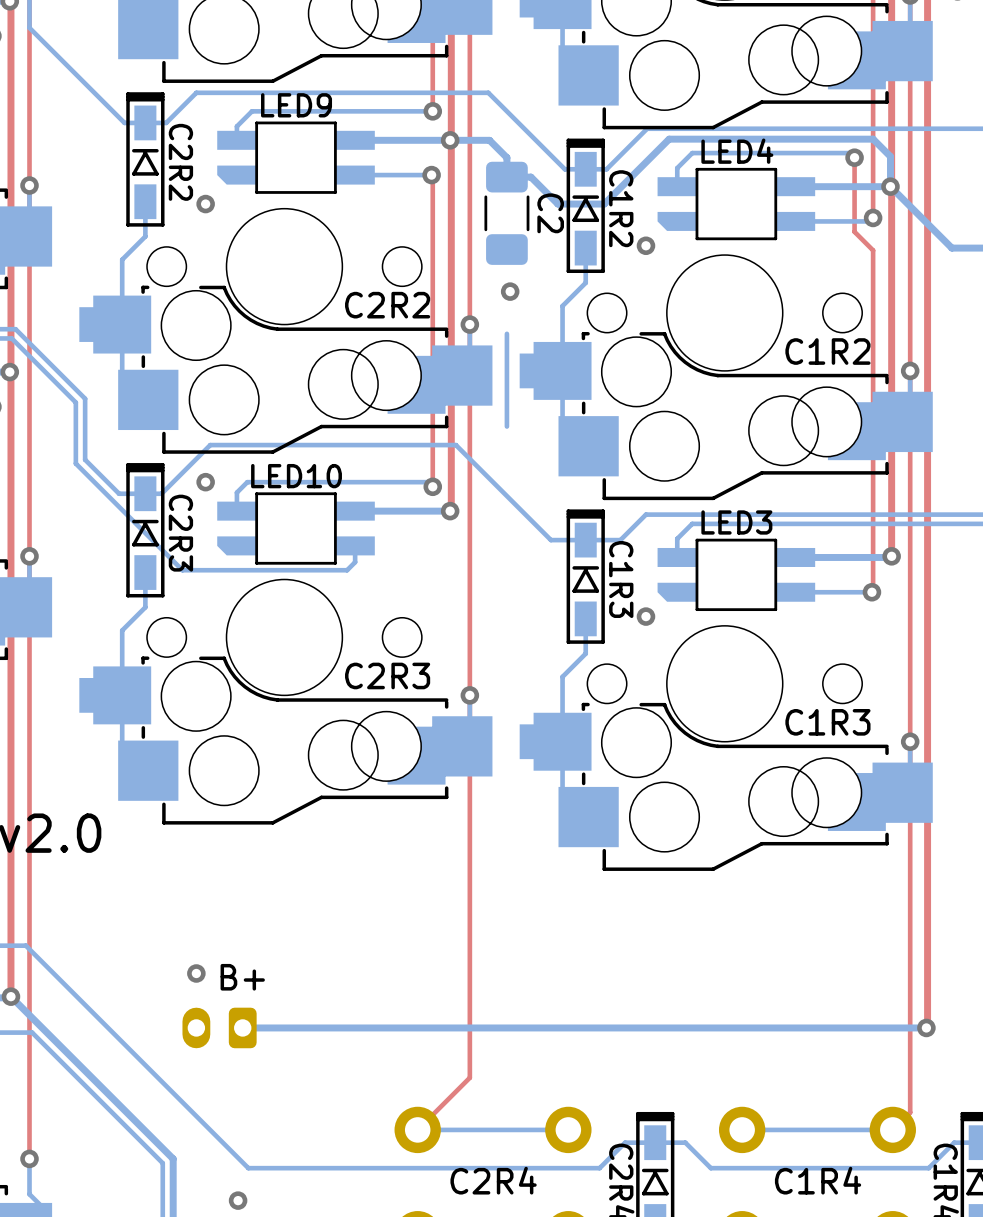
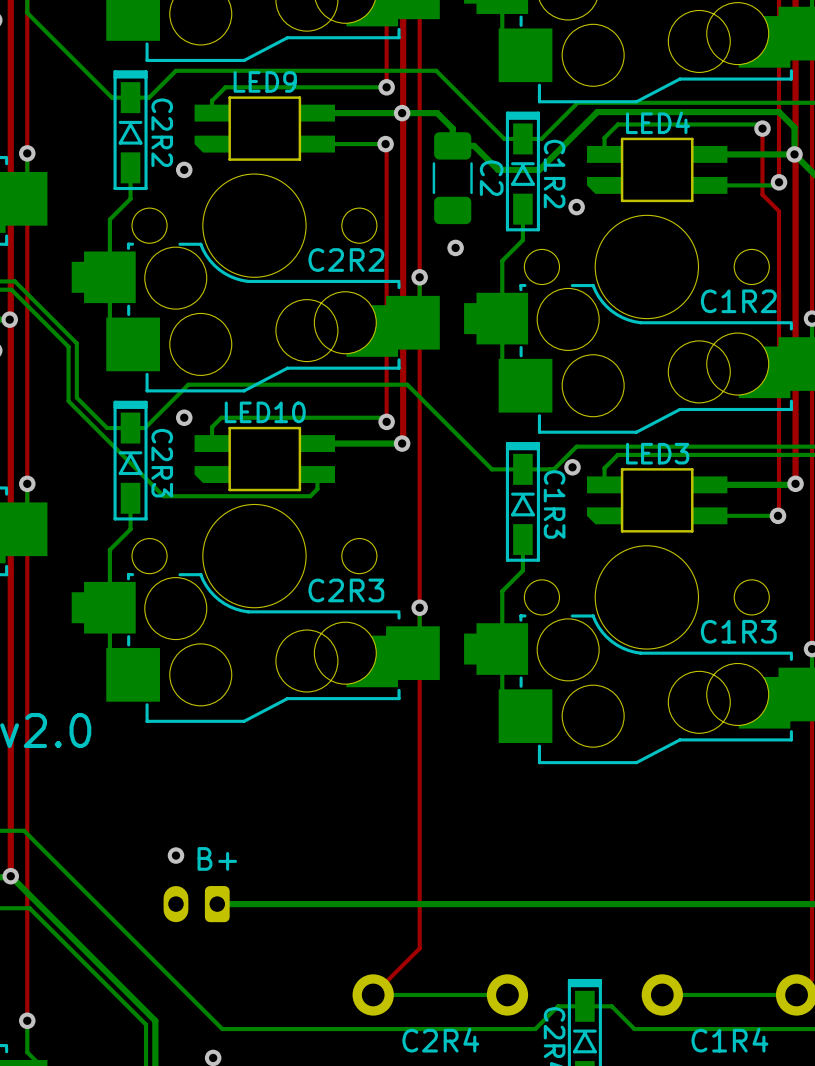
bottom track: (506, 333) (506, 426) -> none
via position: (645, 616) -> (572, 467)

